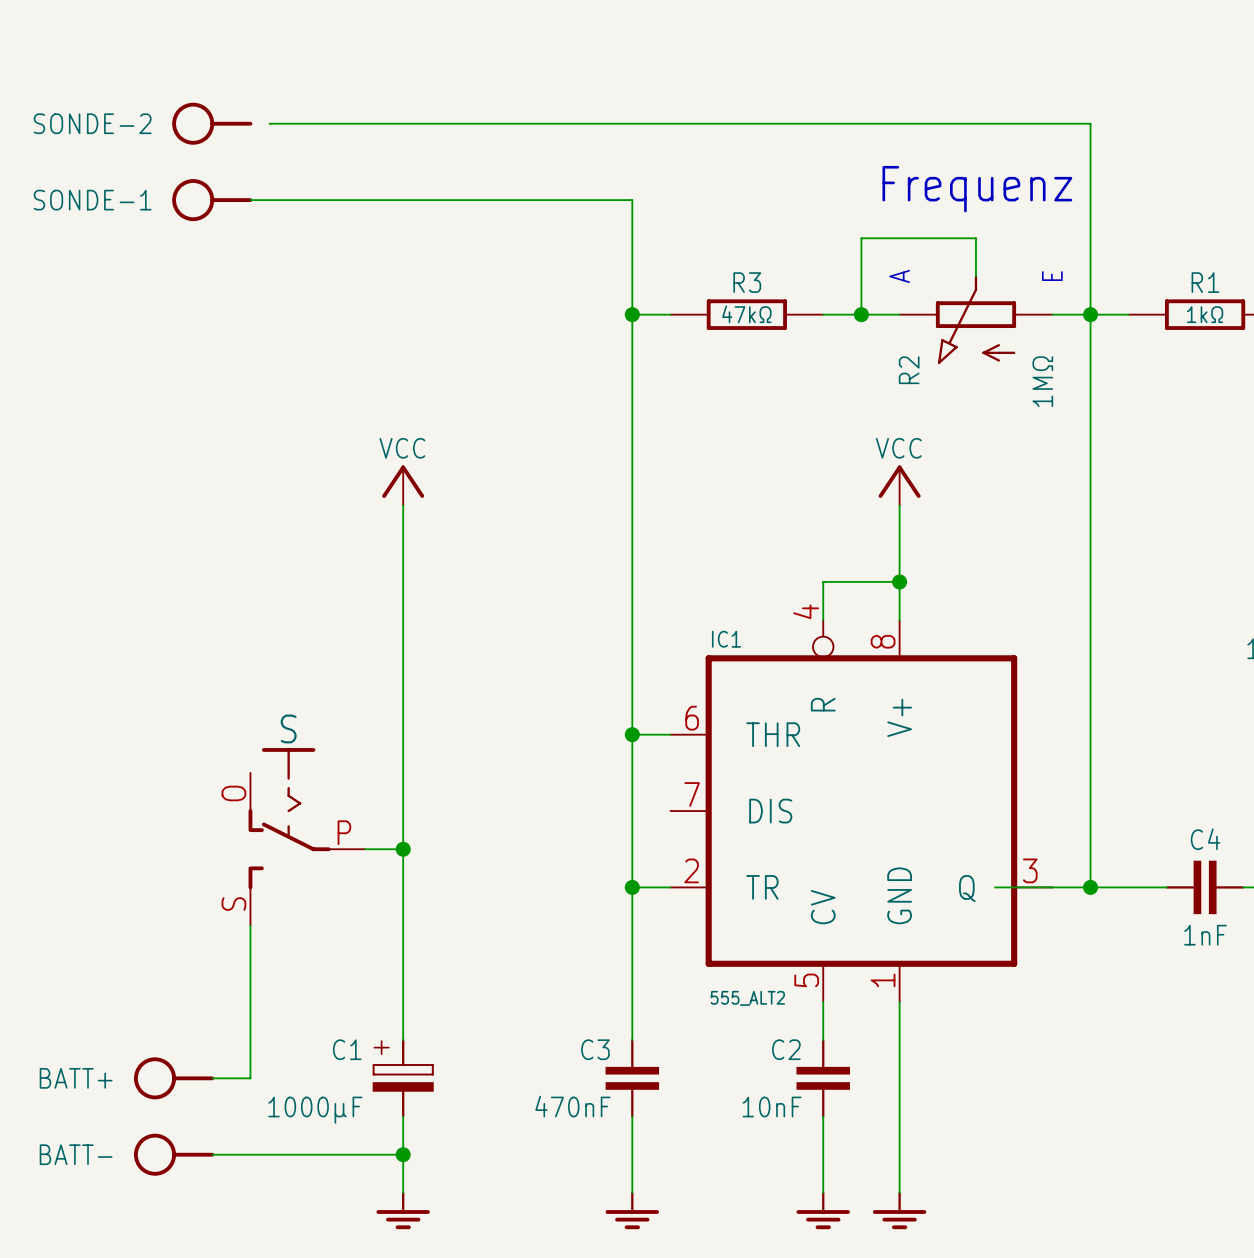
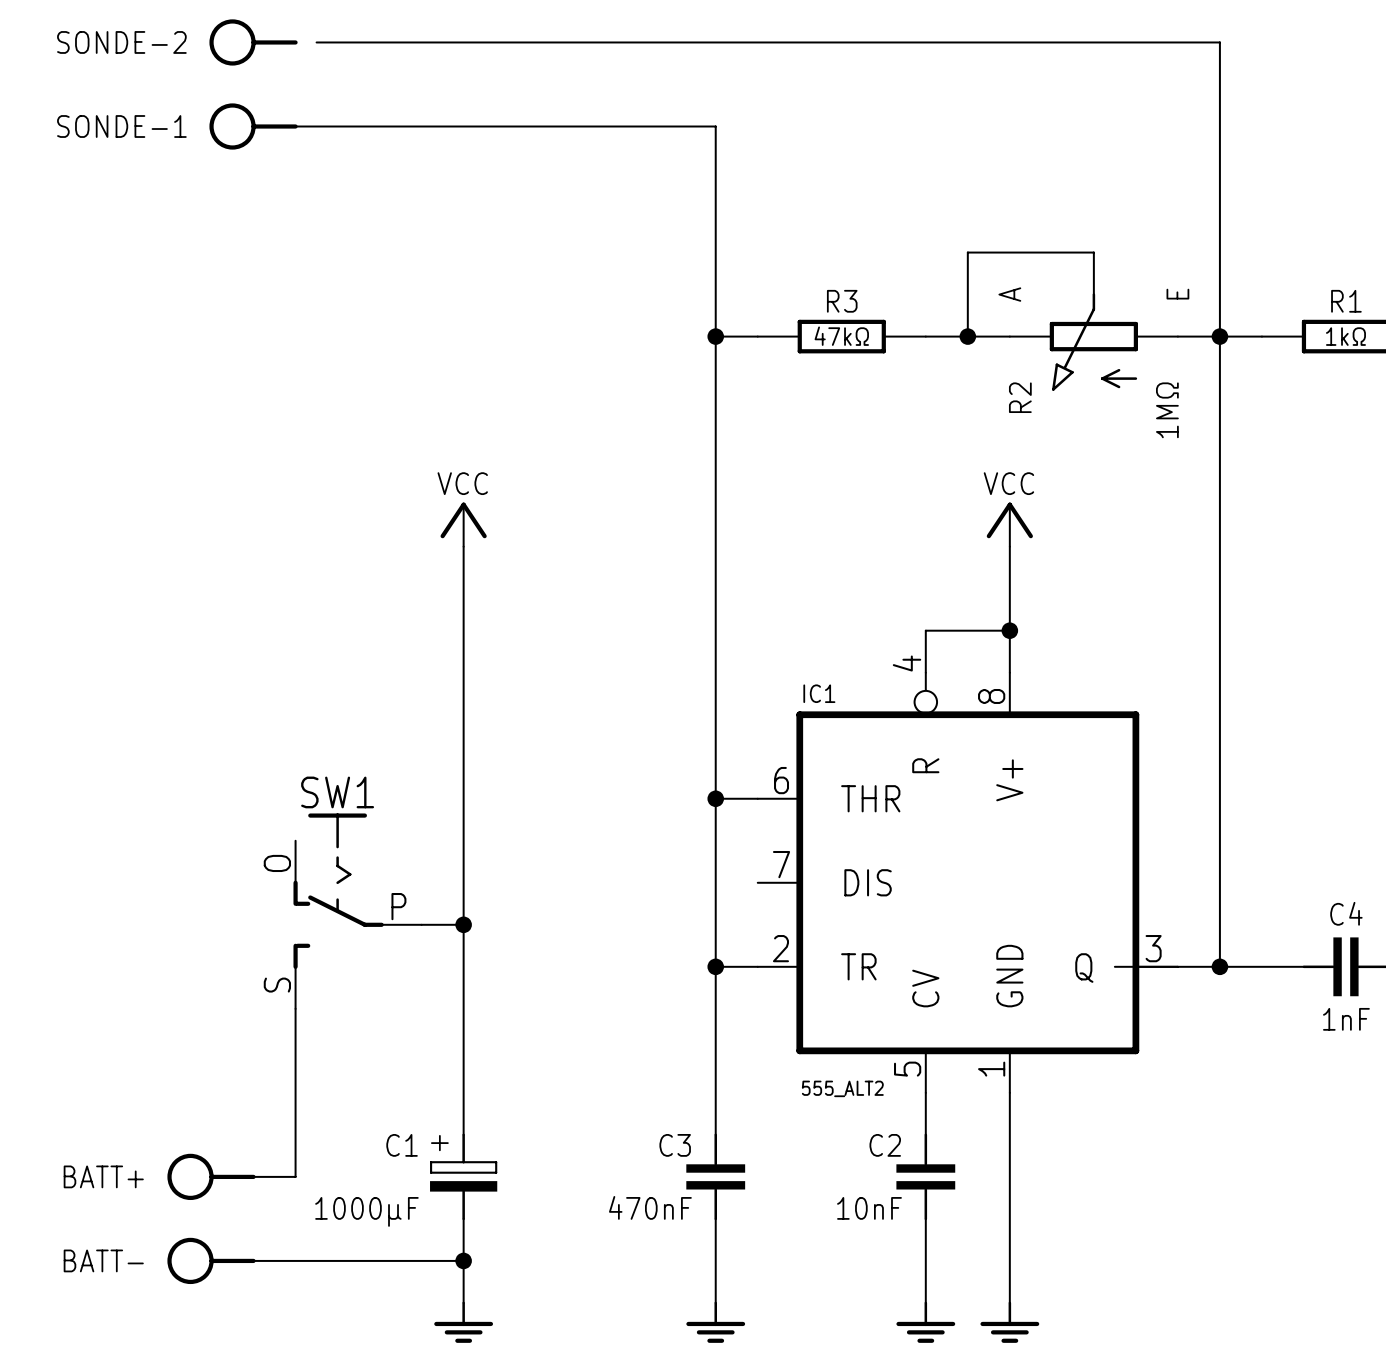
SONDE-2: none -> (253, 42)
SONDE-2 name: SONDE-2 (92, 123) -> SONDE-1 (121, 126)
wire: none -> (295, 126) (316, 126)
wire: (632, 123) (1090, 123) -> (316, 42) (1219, 42) (1219, 126)
text: Frequenz (977, 189) -> none
SONDE-1: (212, 200) -> none
wire: (250, 200) (632, 200) -> (715, 126) (715, 210)
S name: S (288, 728) -> SW1 (337, 792)

